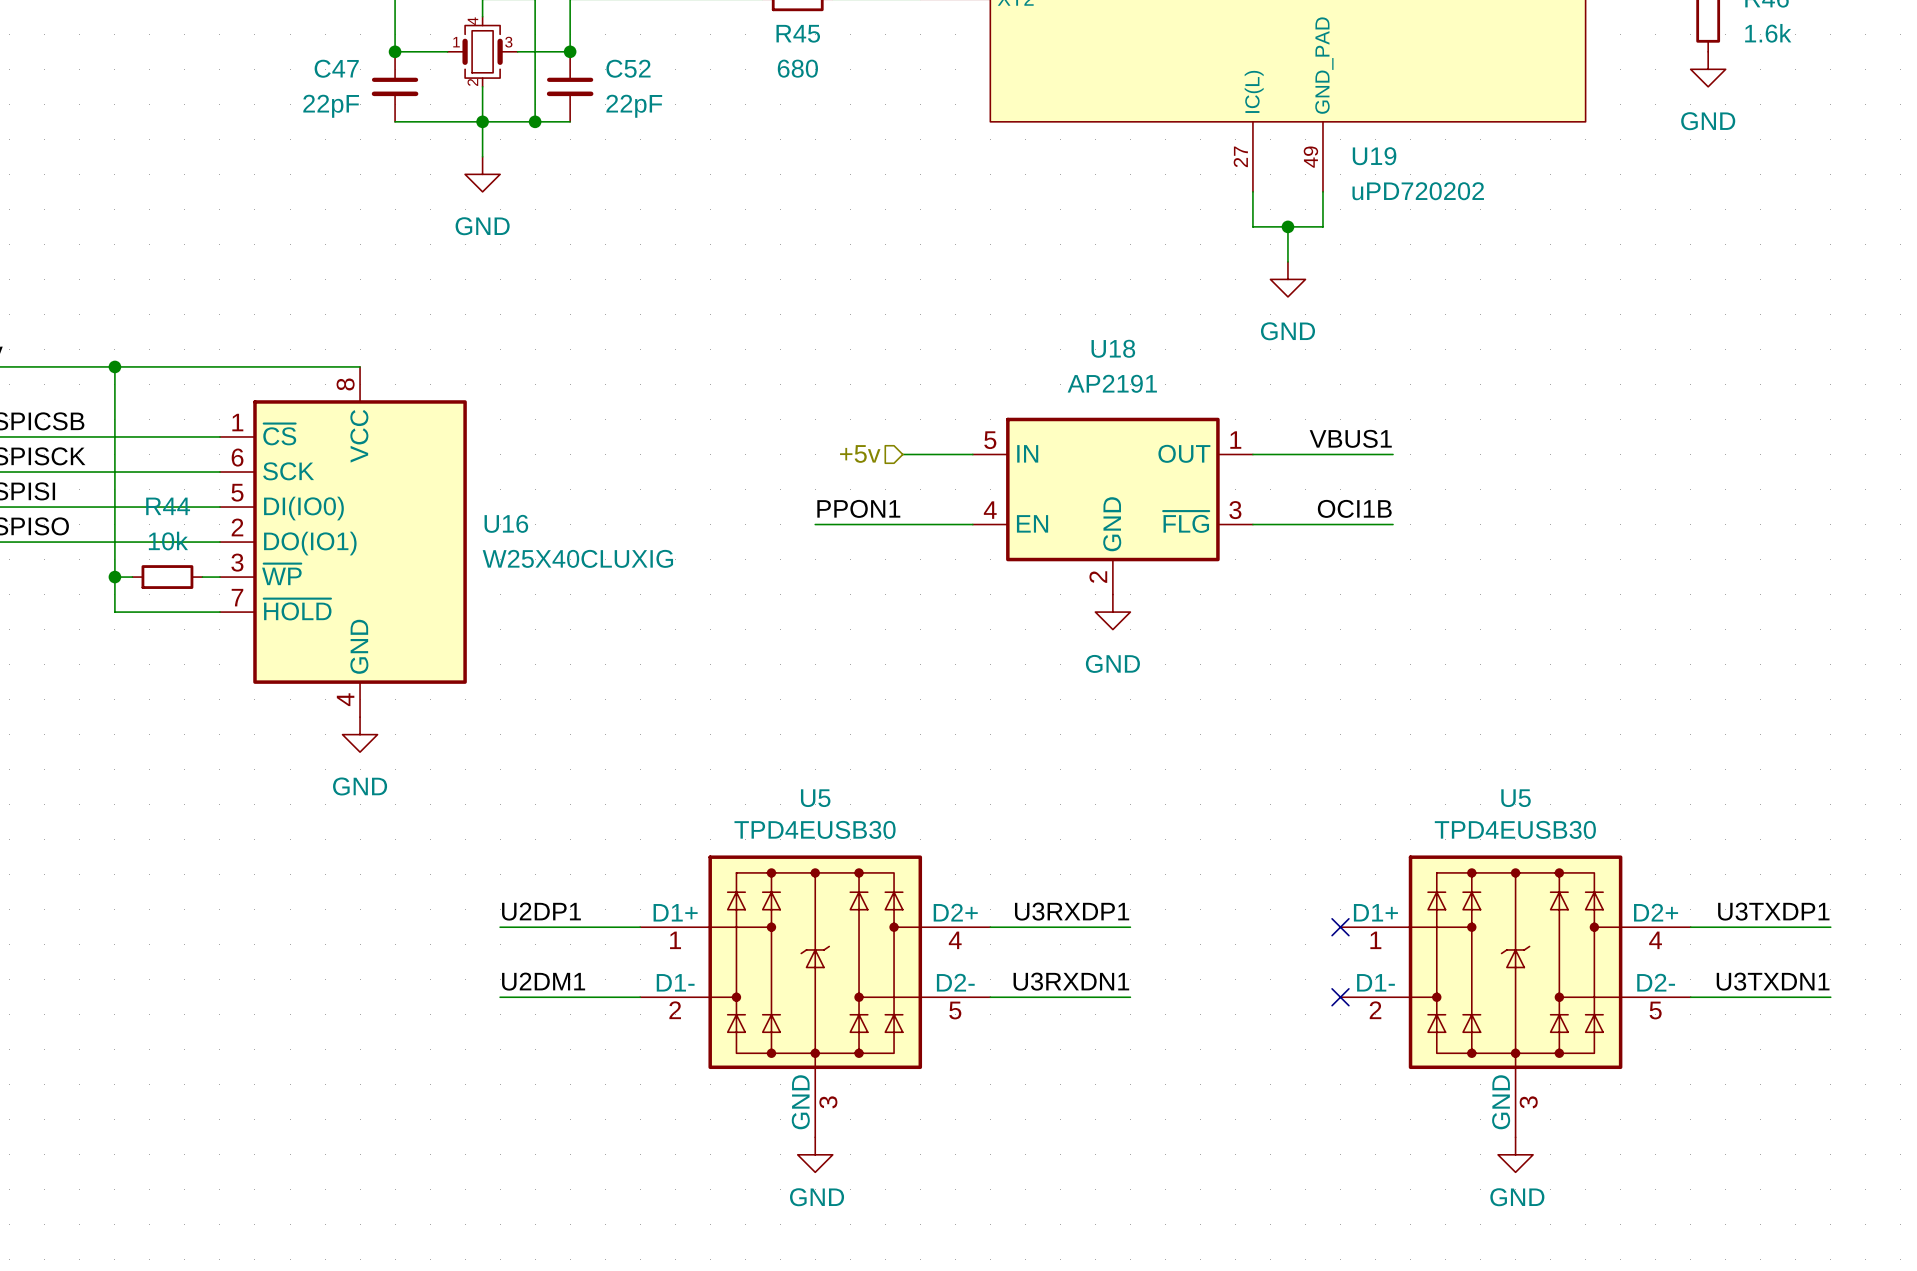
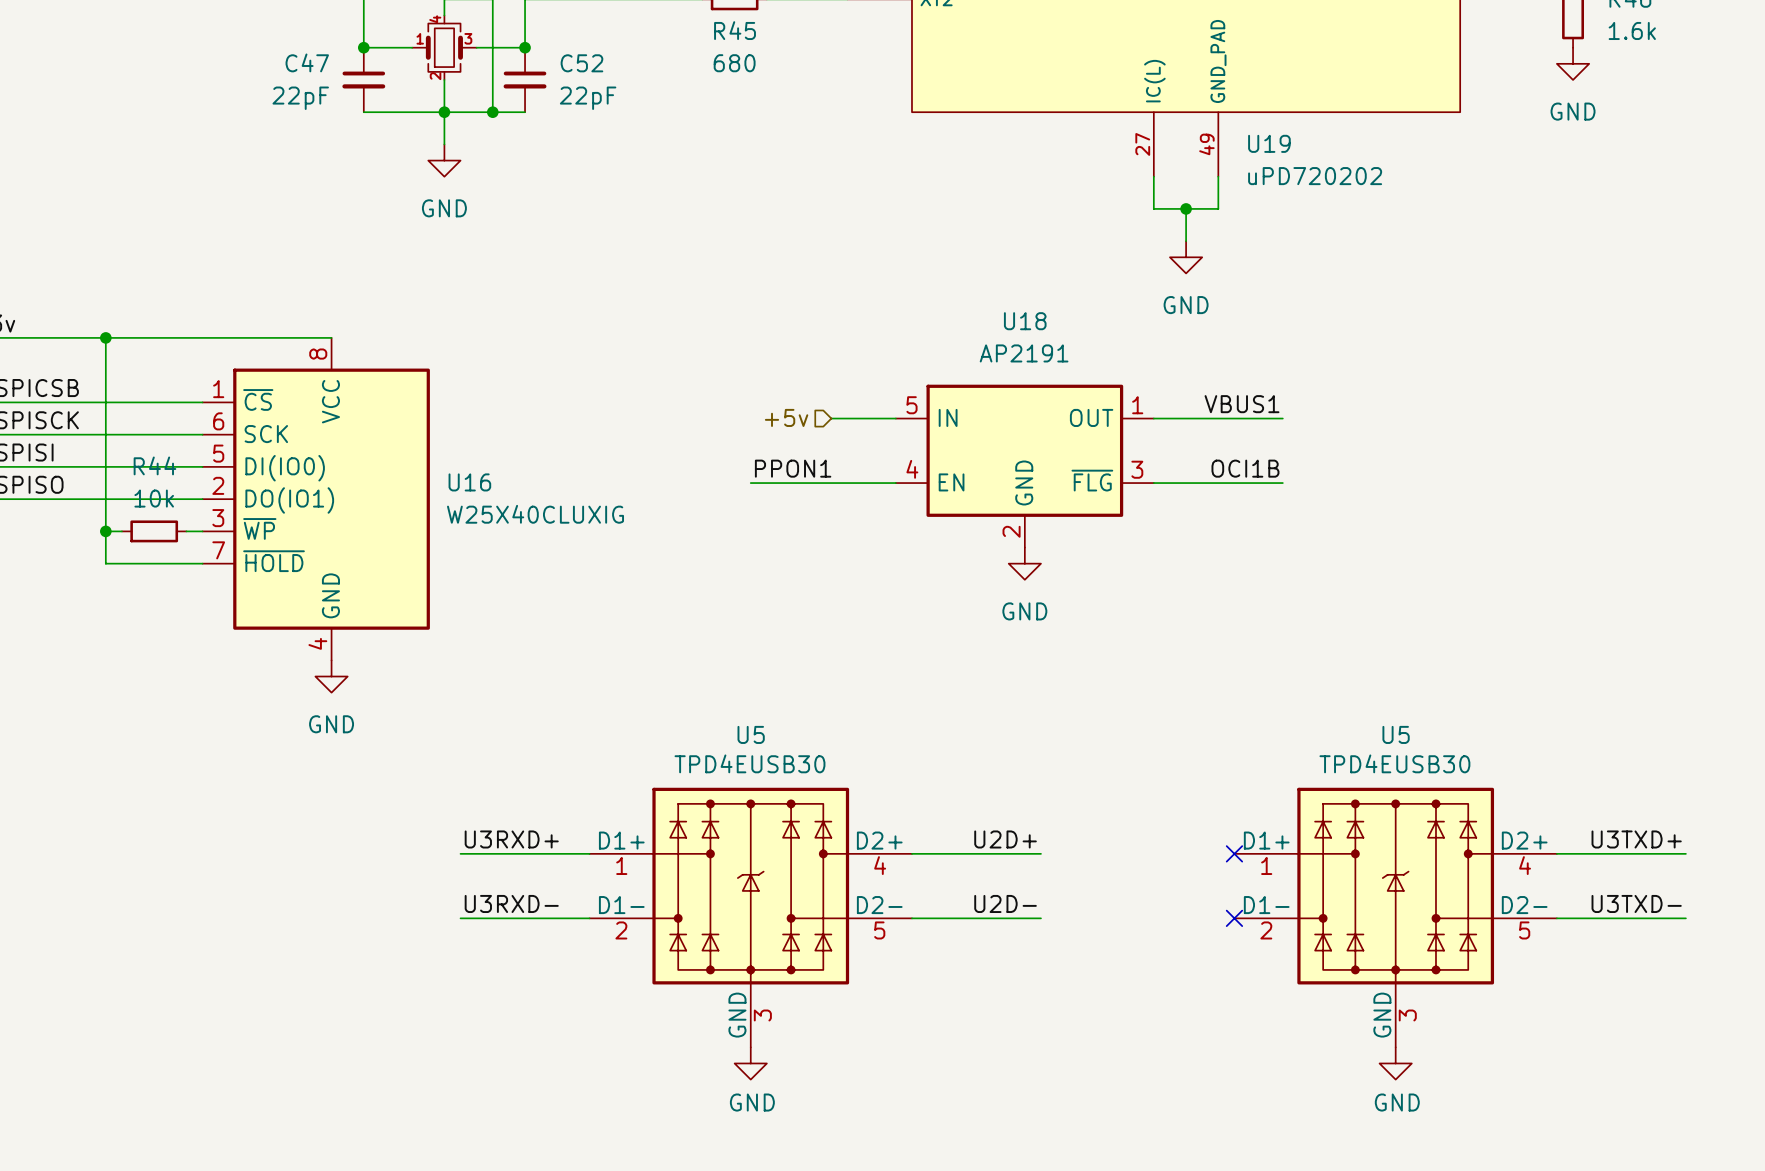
label: U2DP1 (541, 911) -> U3RXD+ (511, 839)
label: U3RXDP1 (1072, 911) -> U2D+ (1005, 839)
label: U3TXDP1 (1773, 911) -> U3TXD+ (1636, 839)
label: U2DM1 (543, 981) -> U3RXD- (511, 903)
label: U3RXDN1 (1071, 981) -> U2D- (1005, 903)
label: U3TXDN1 (1773, 981) -> U3TXD- (1636, 903)

